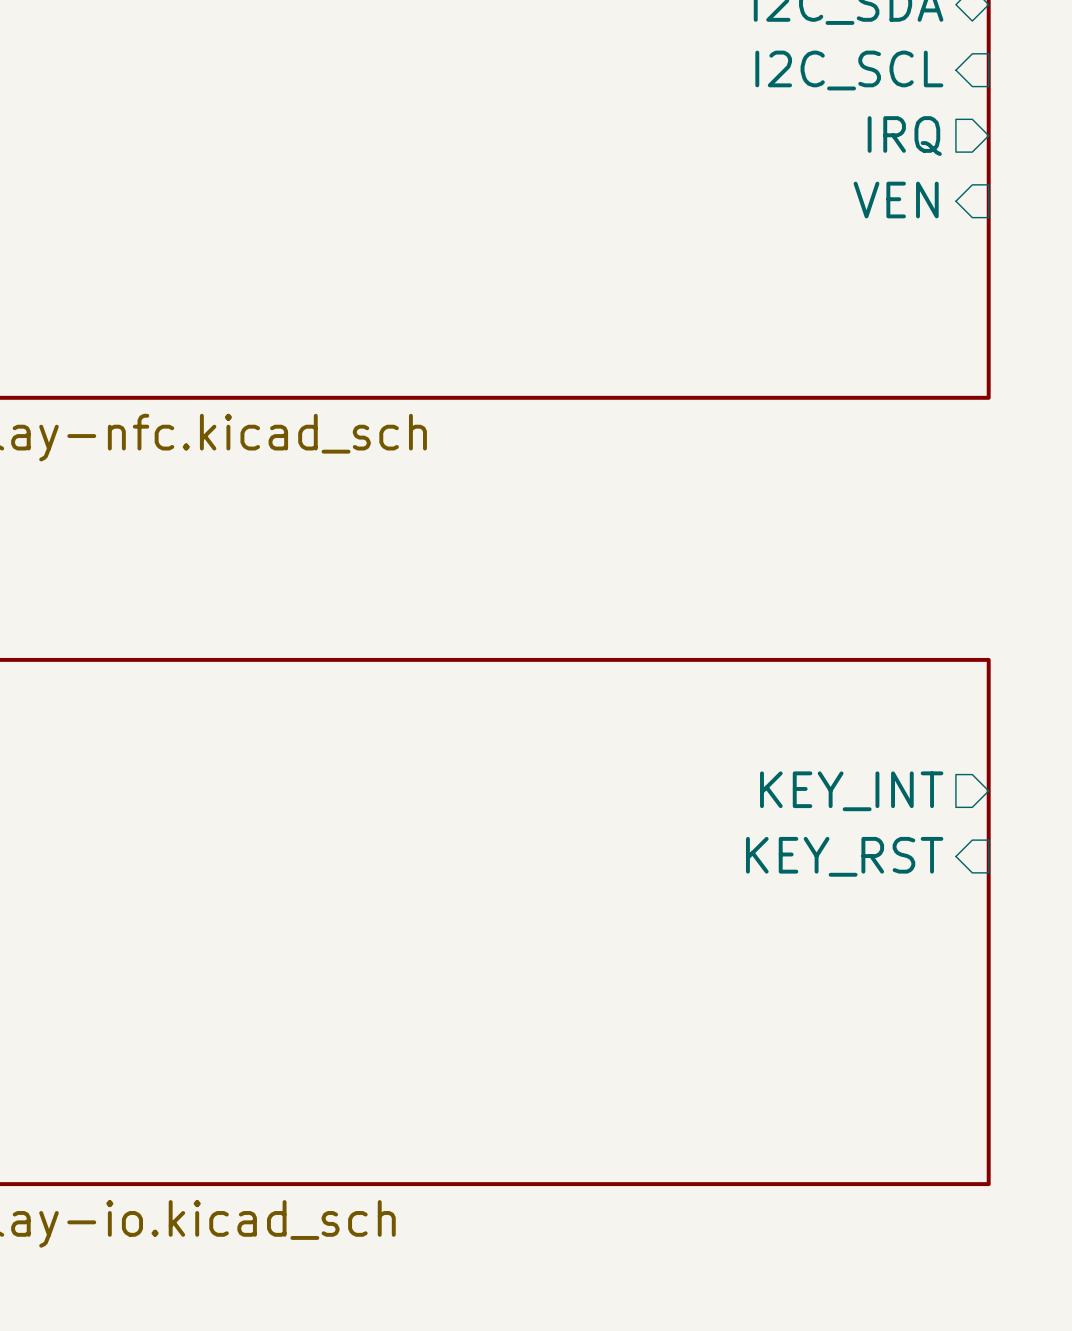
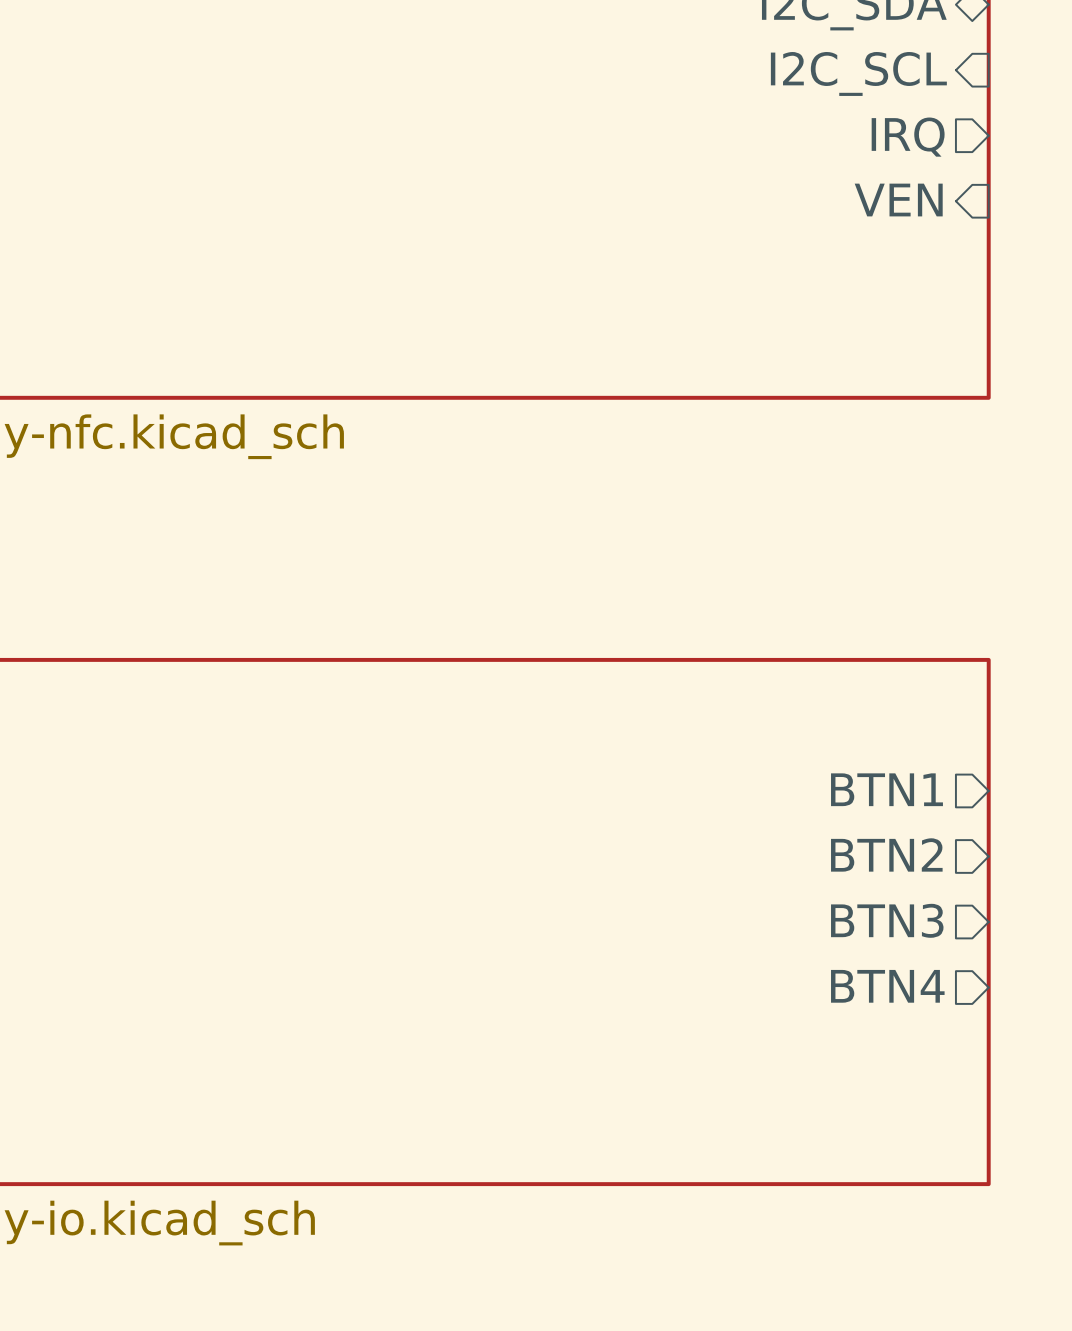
sheet pin: KEY_INT (851, 791) -> BTN1 (886, 789)
sheet pin shape: input (844, 856) -> output (886, 854)
sheet pin: KEY_RST (844, 856) -> BTN2 (886, 854)
sheet pin: none -> BTN3 (887, 920)
sheet pin: none -> BTN4 (887, 986)

